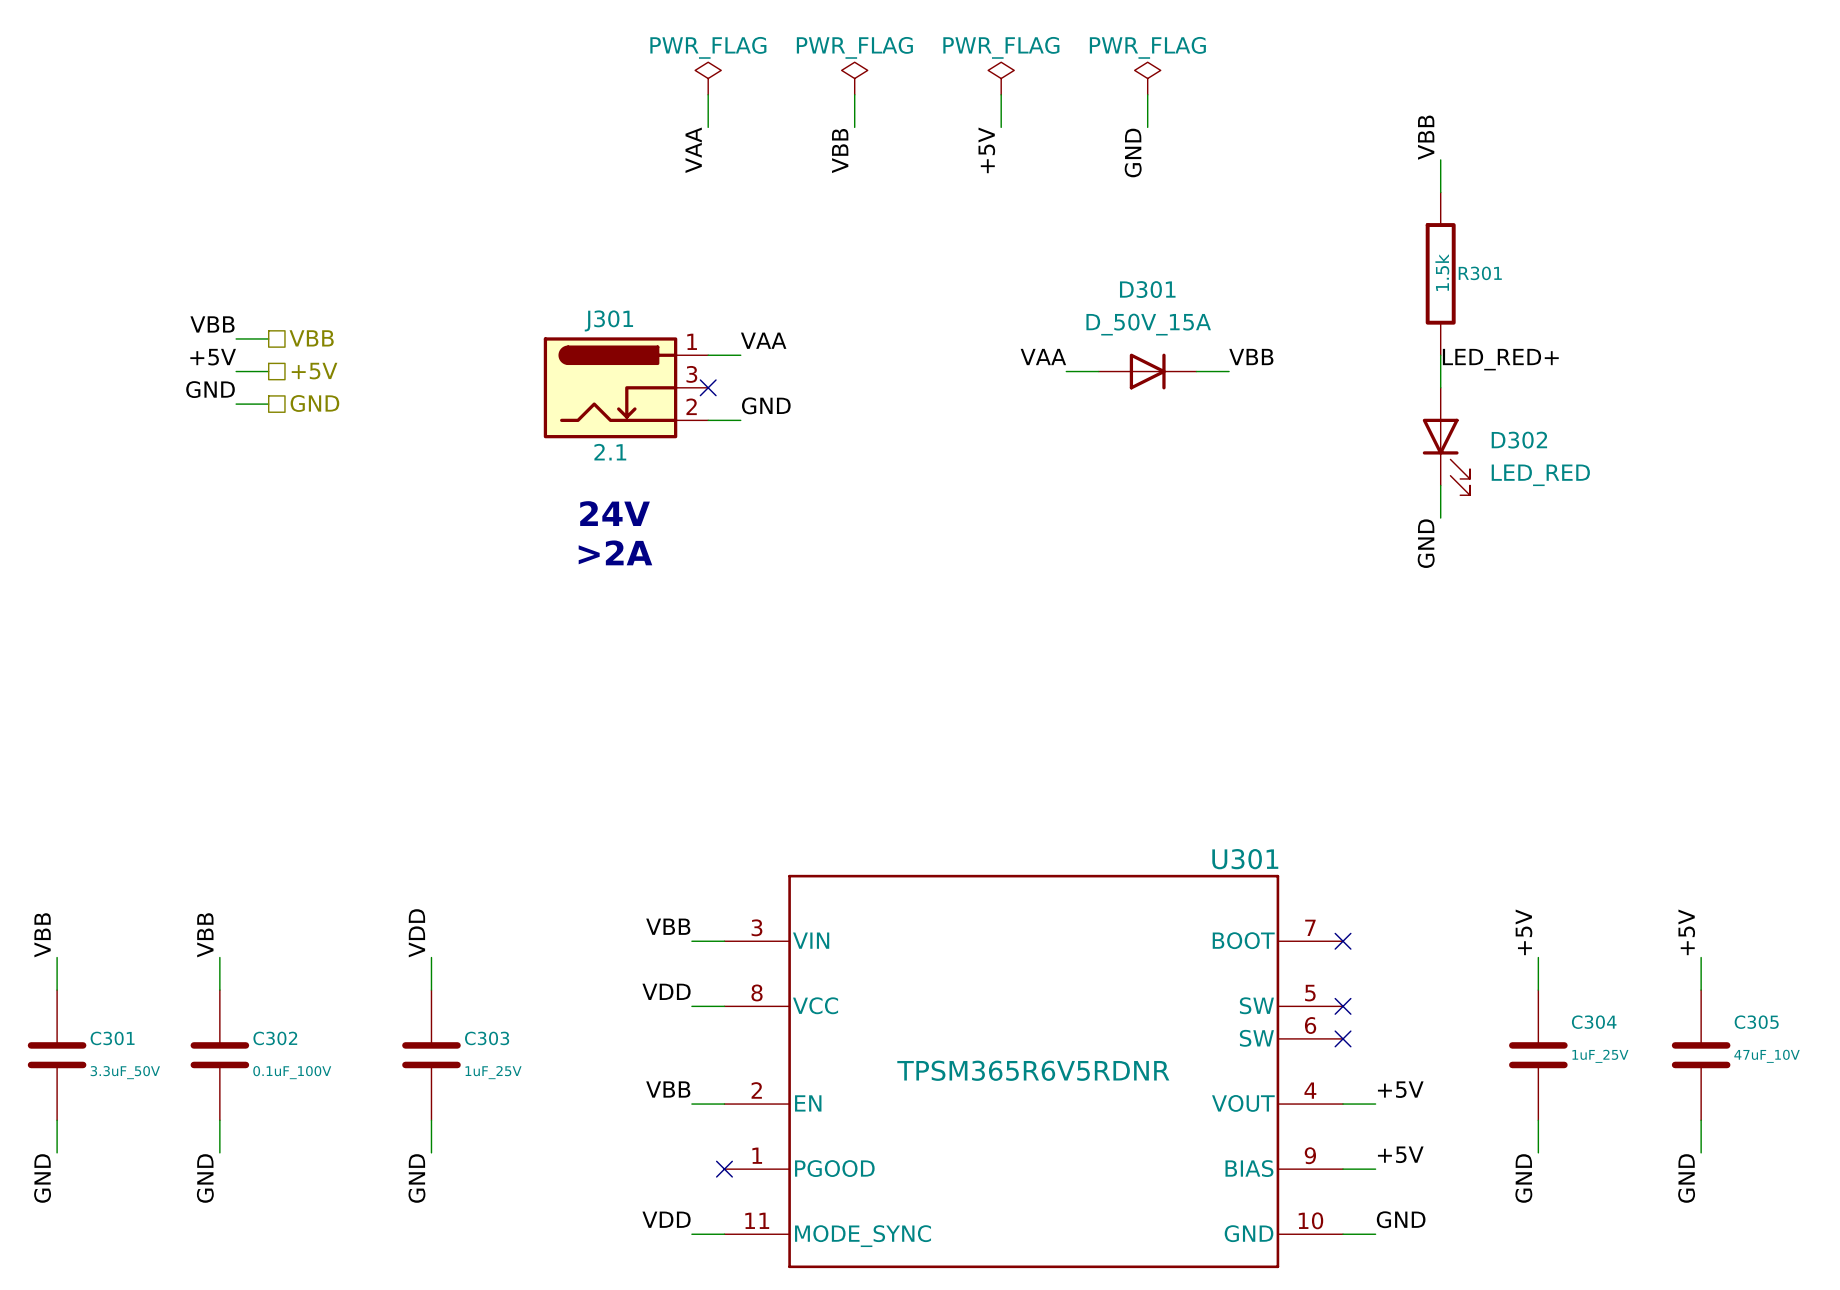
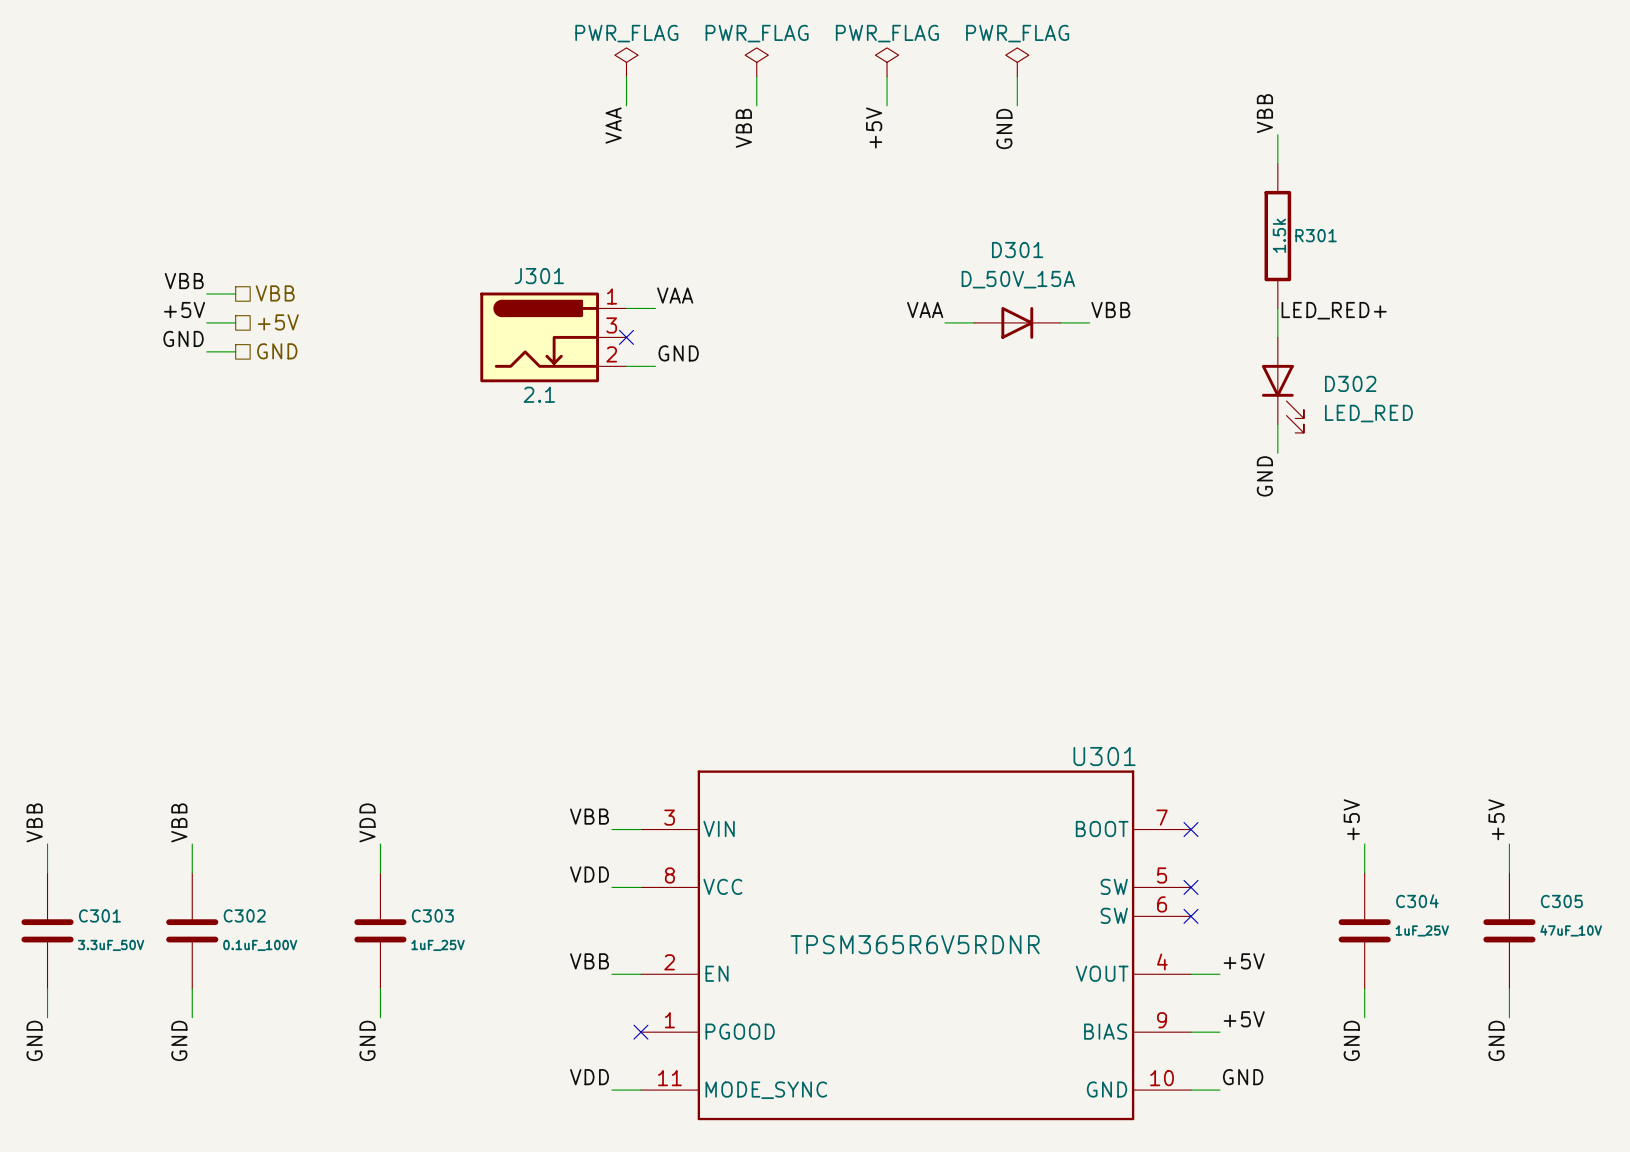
text: 24V (615, 513) -> none
text: >2A (615, 552) -> none

